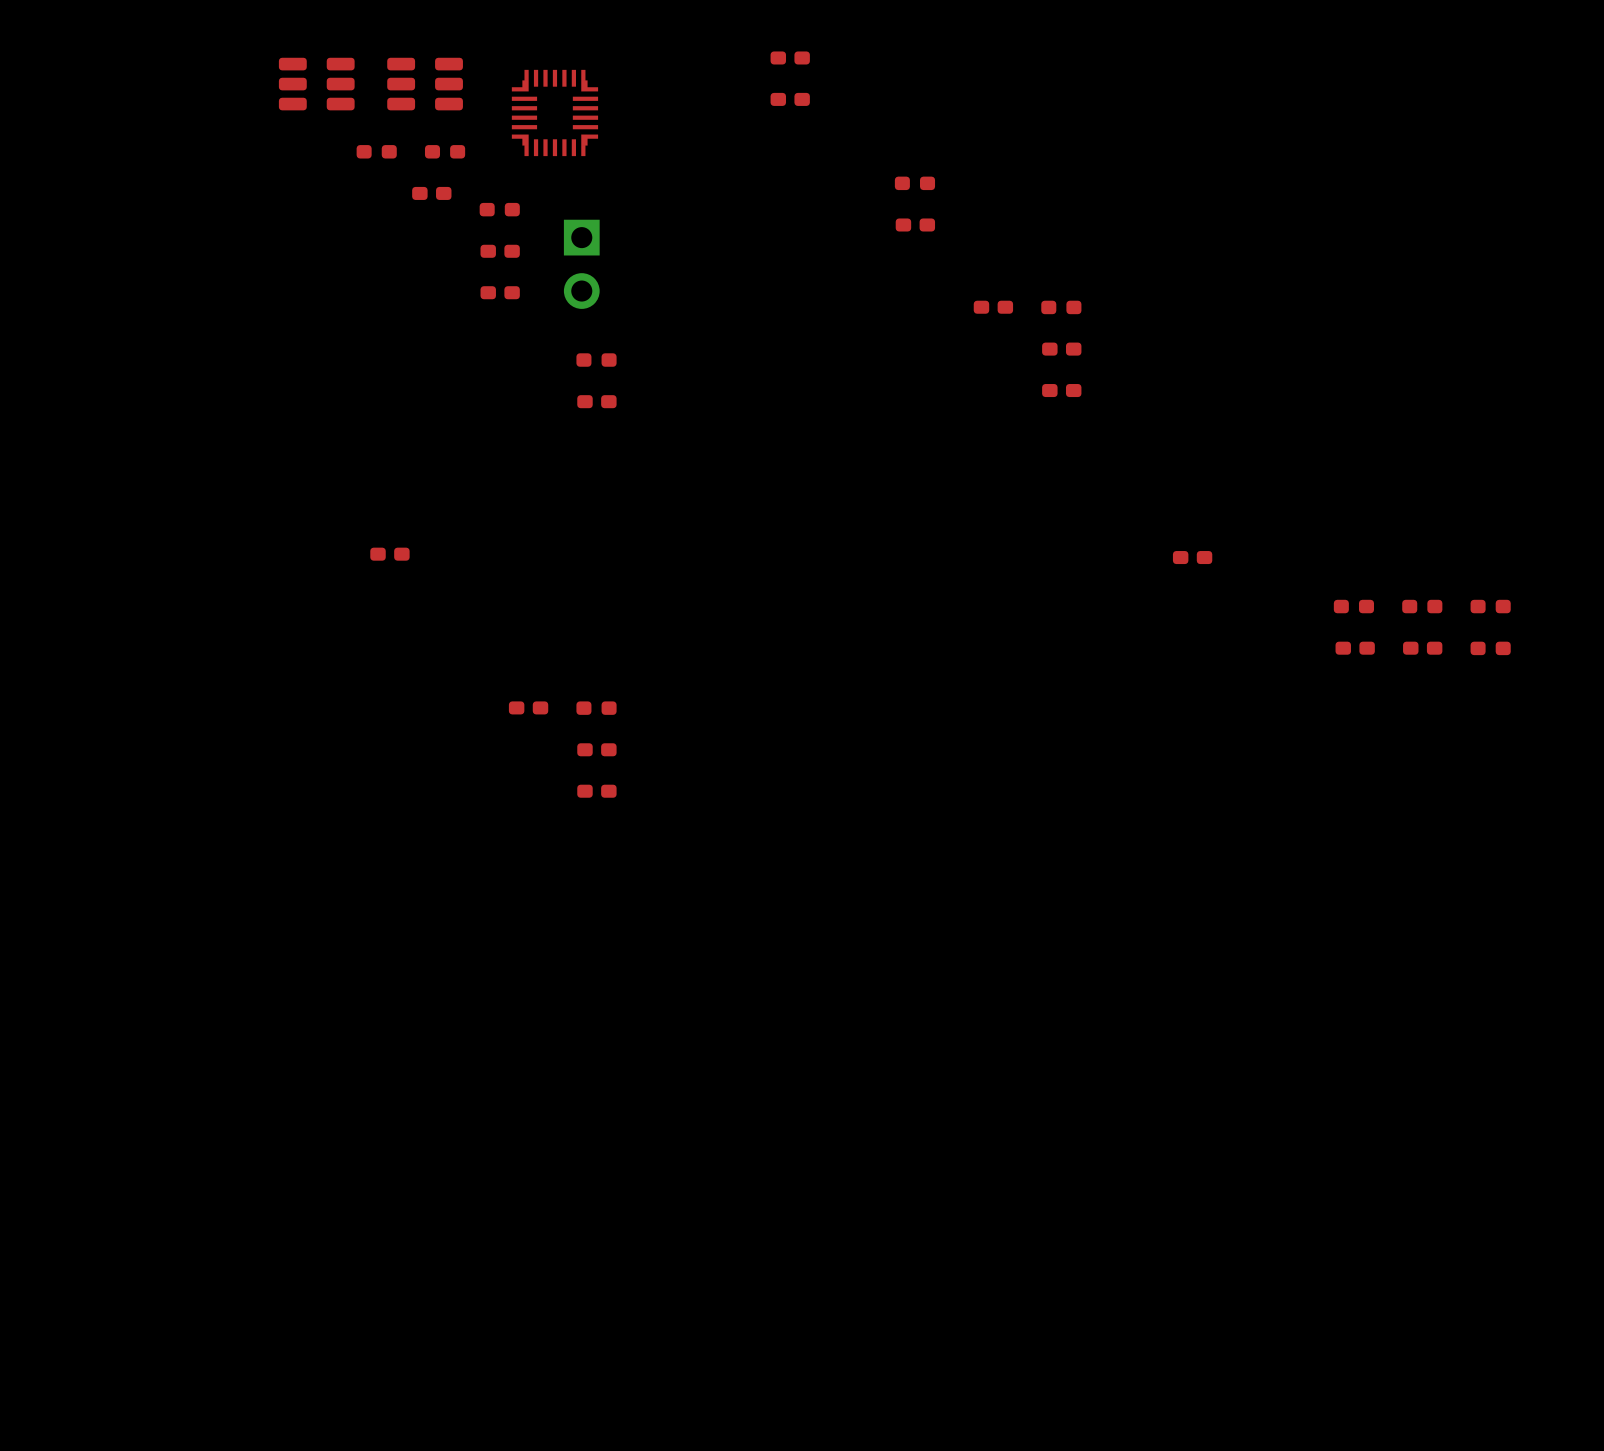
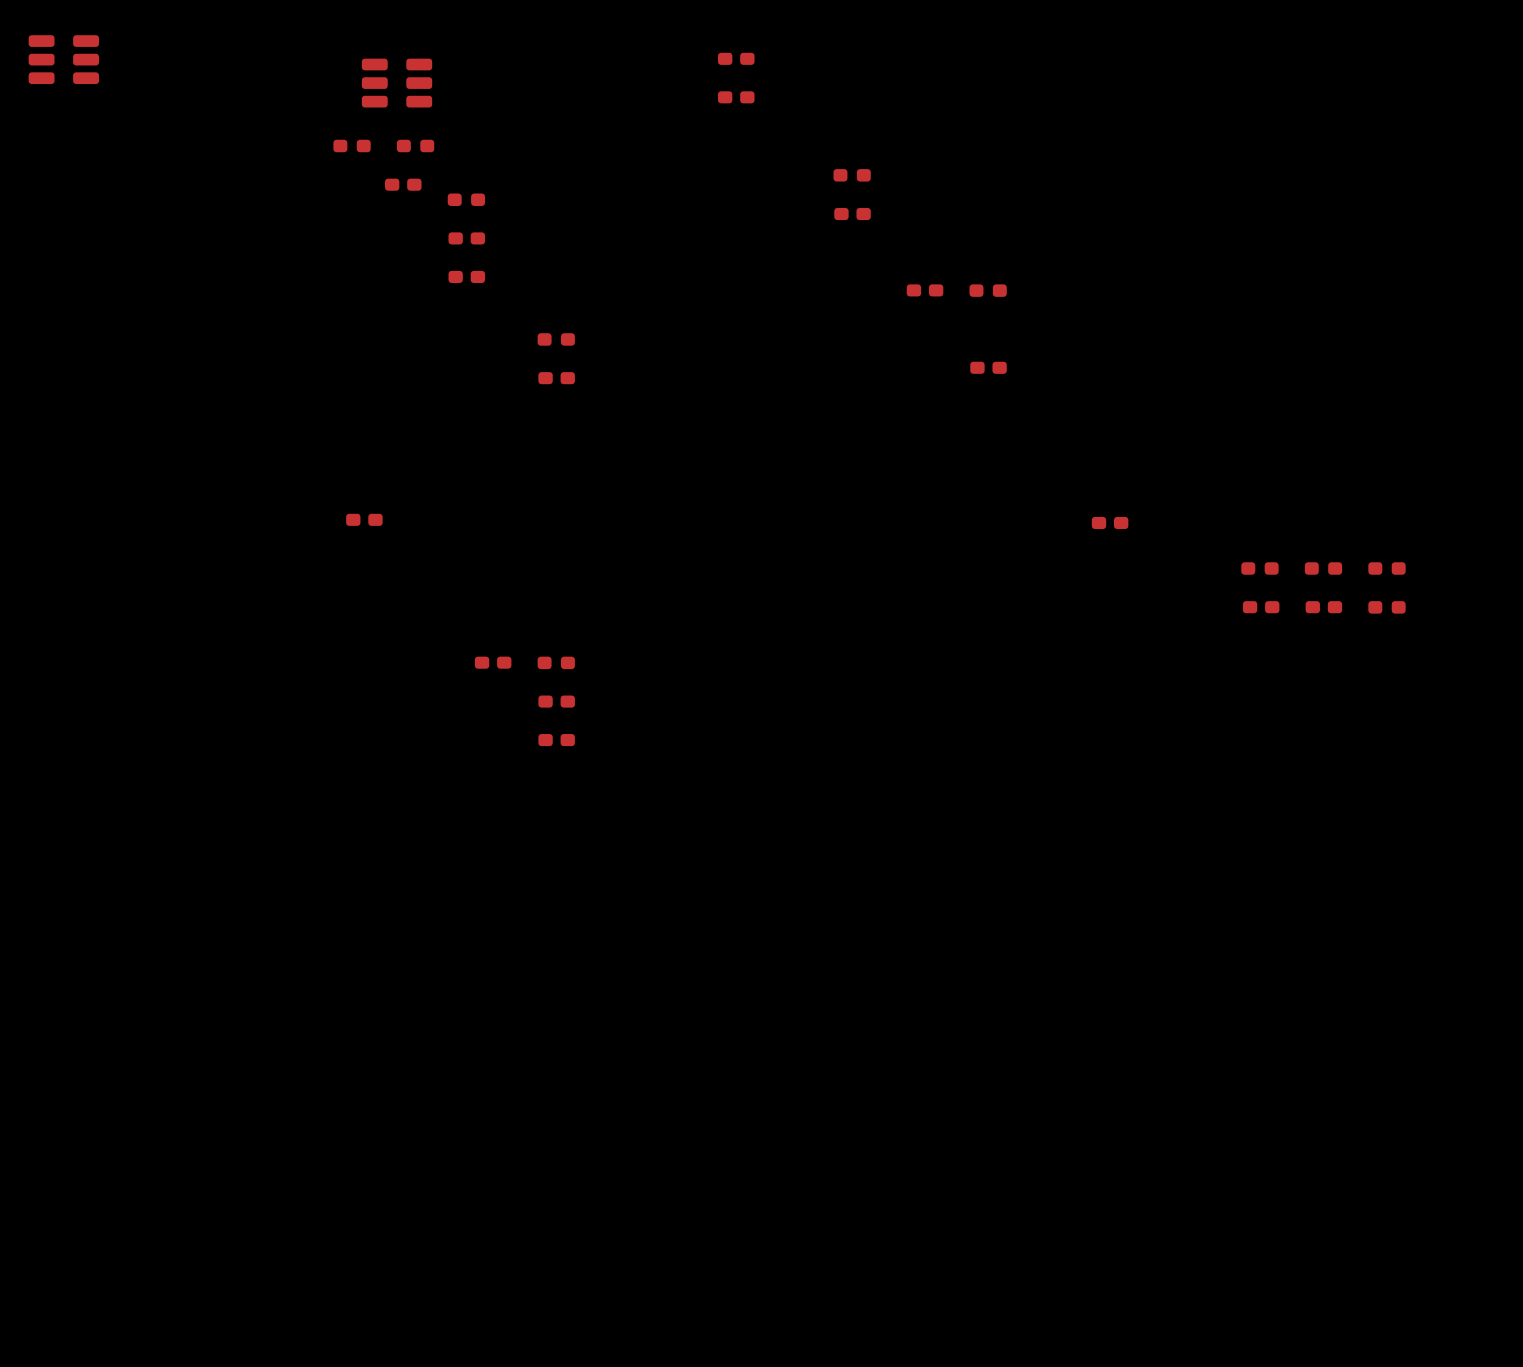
part position: (316, 84) -> (63, 59)
part: (554, 112) -> none
part: (581, 264) -> none
part: (1061, 349) -> none

